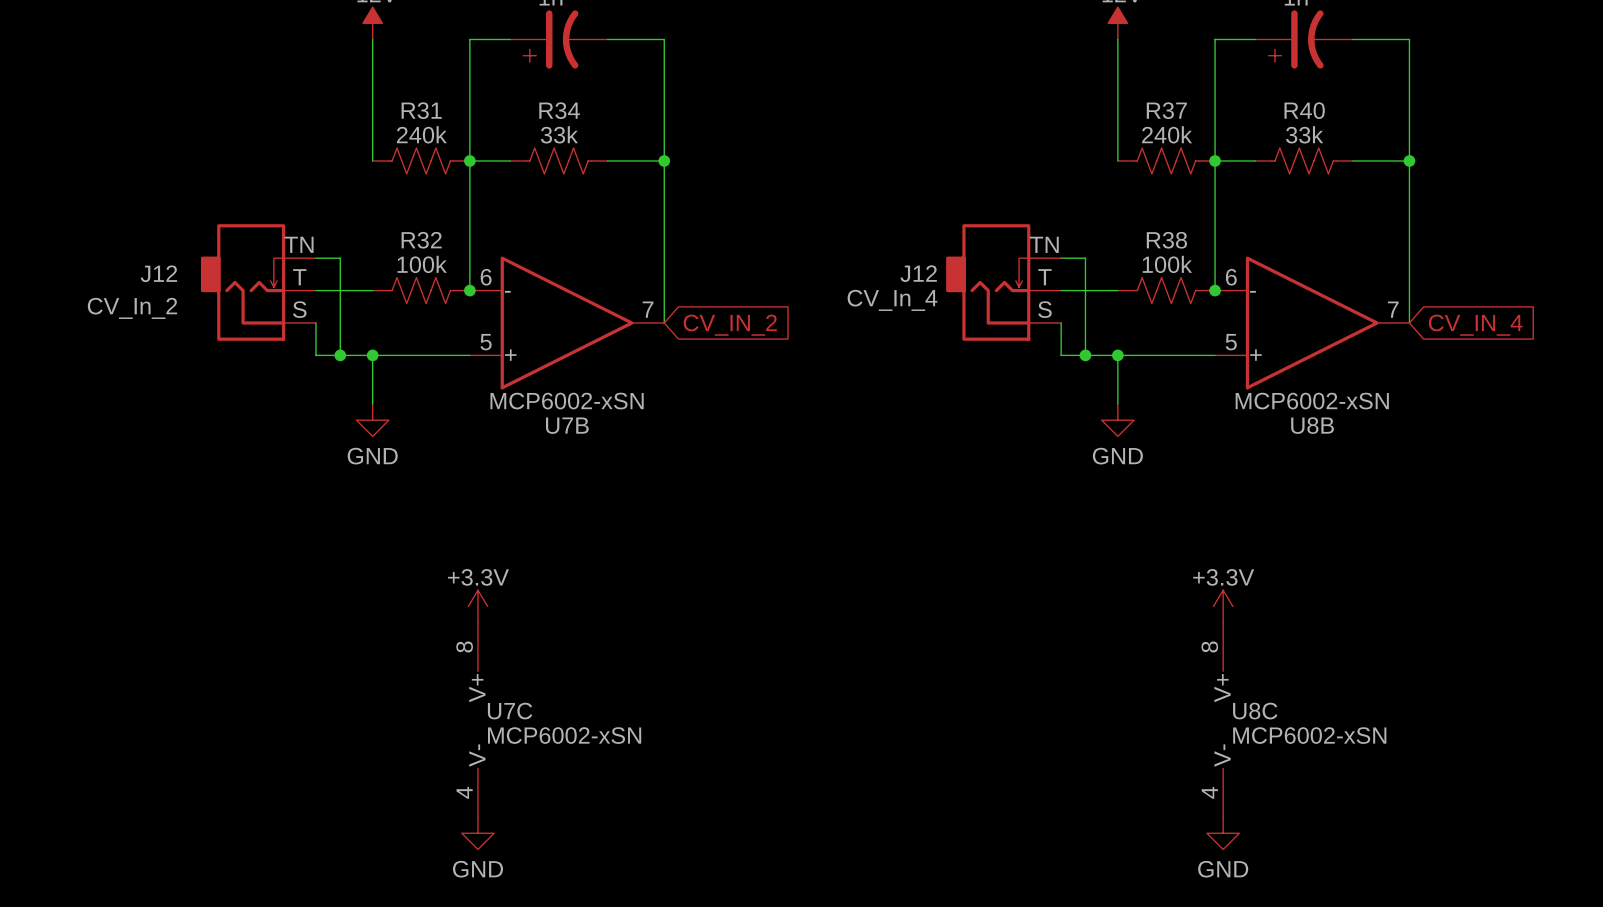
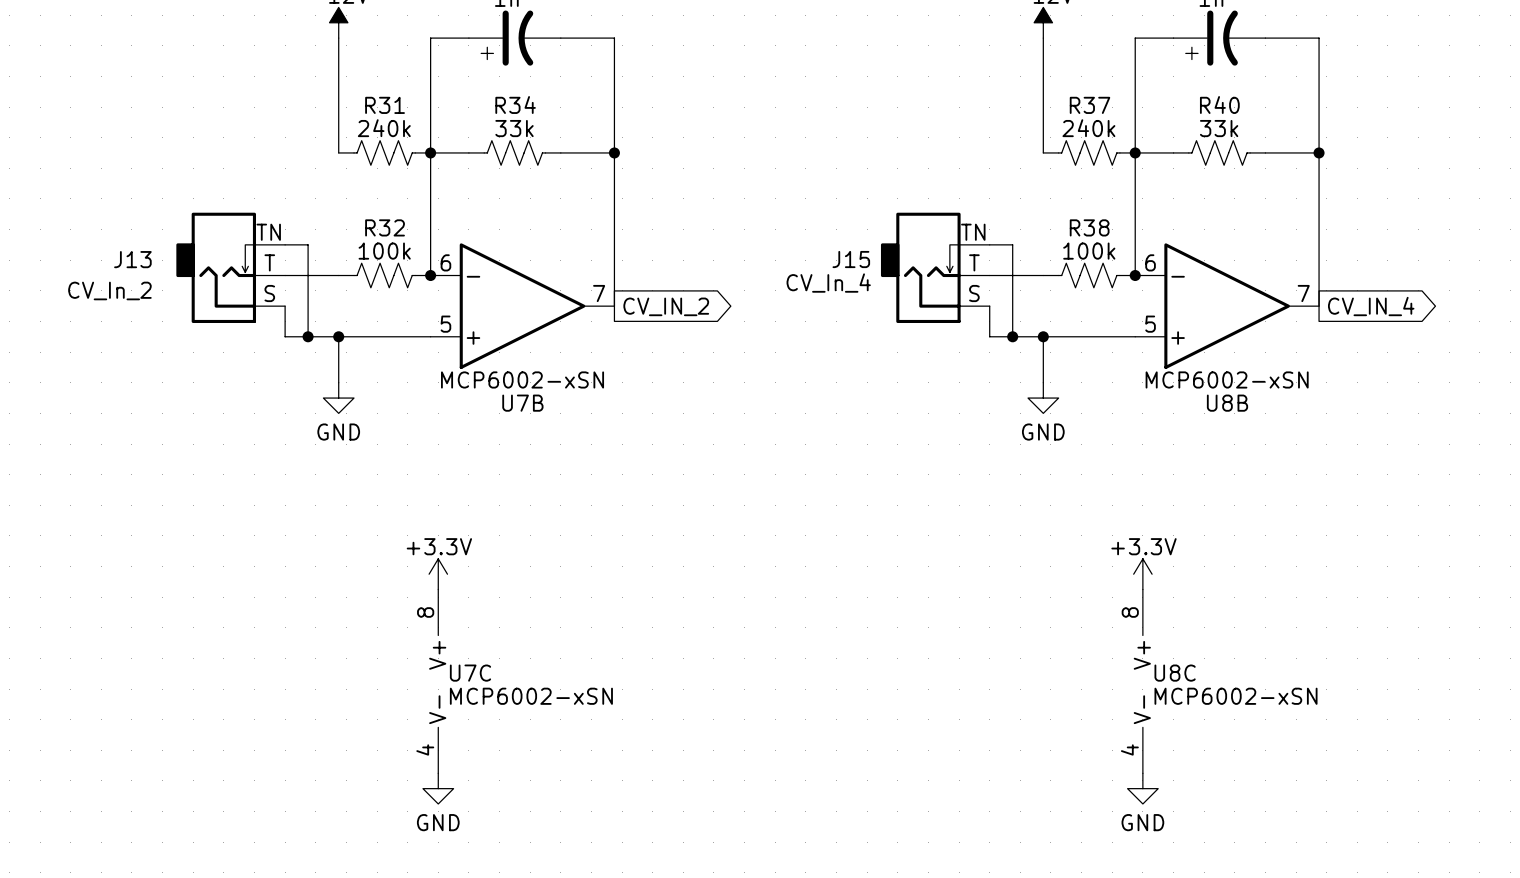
J12 name: J12 (158, 273) -> J13 (132, 259)
J12 name: J12 (918, 273) -> J15 (851, 259)
global label shape: input (730, 325) -> output (666, 306)
global label shape: input (1475, 325) -> output (1371, 306)

